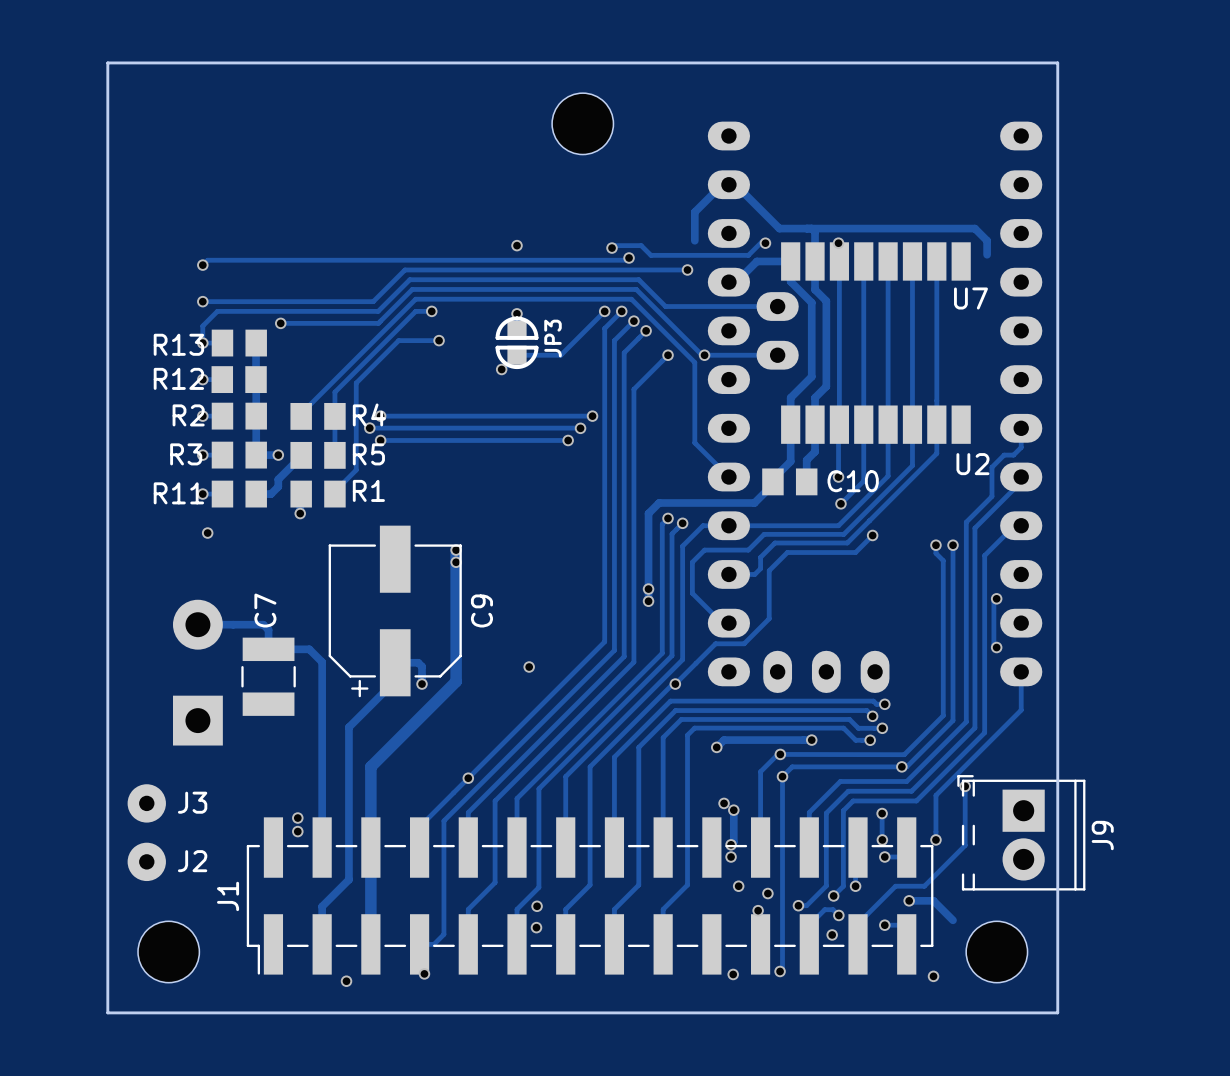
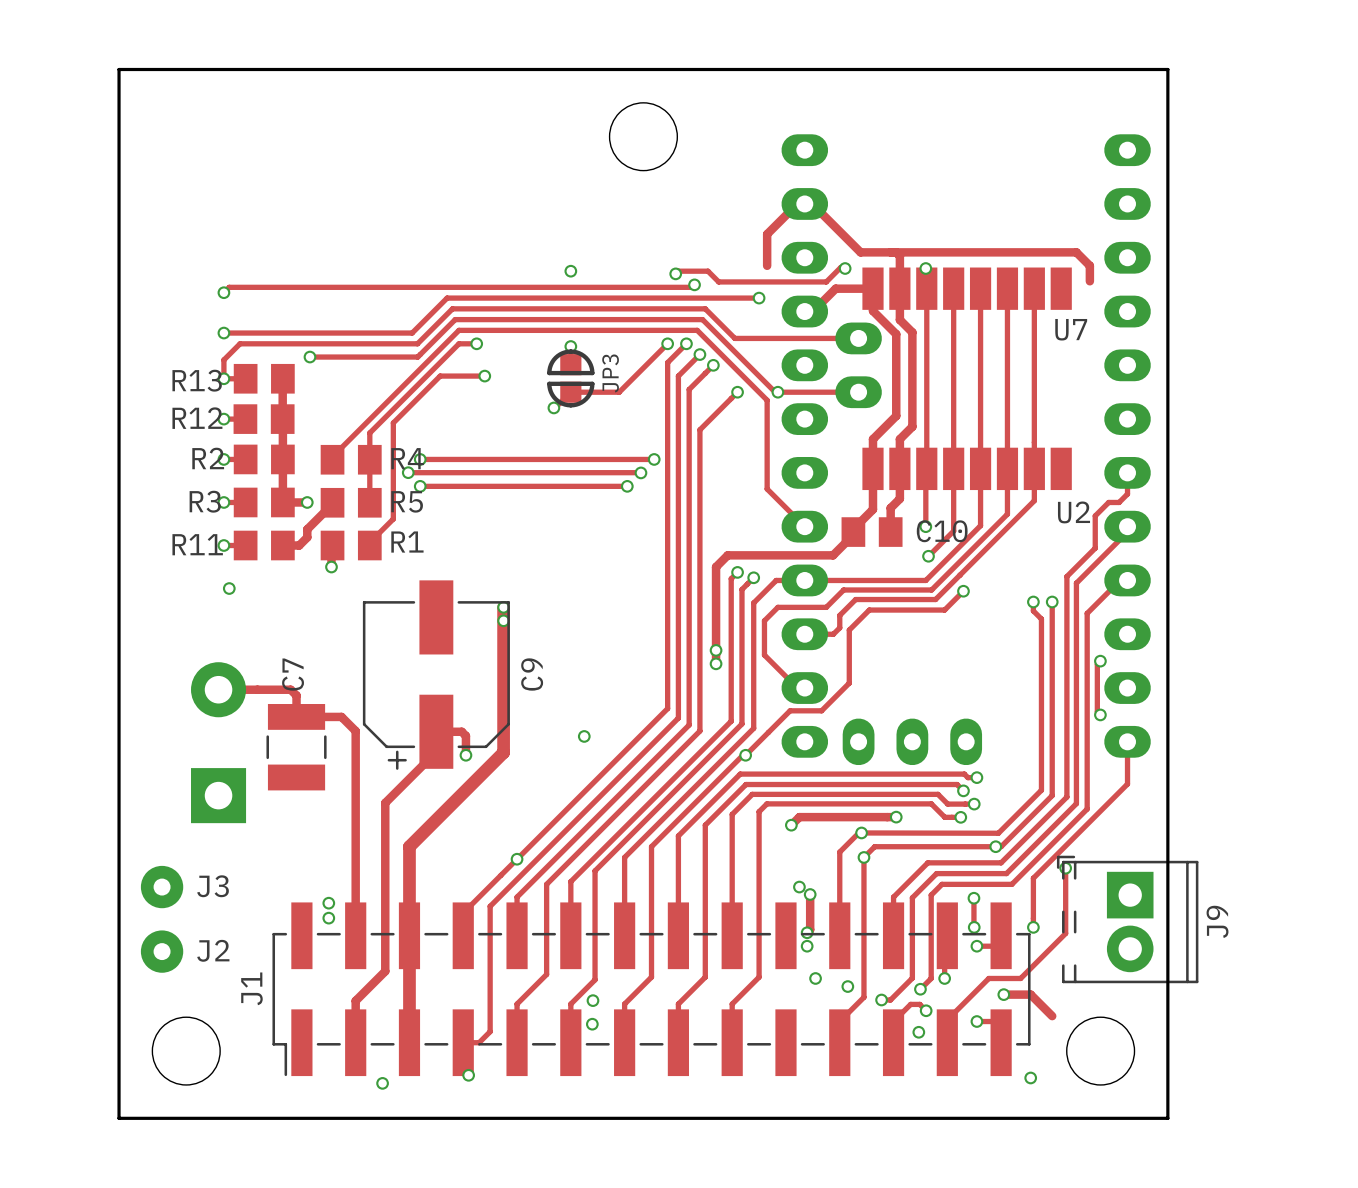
track: (782, 903) (782, 969) (780, 971) -> (863, 997) (839, 1021)
via: (758, 910) -> none
via: (780, 971) -> none
via: (733, 974) -> none

